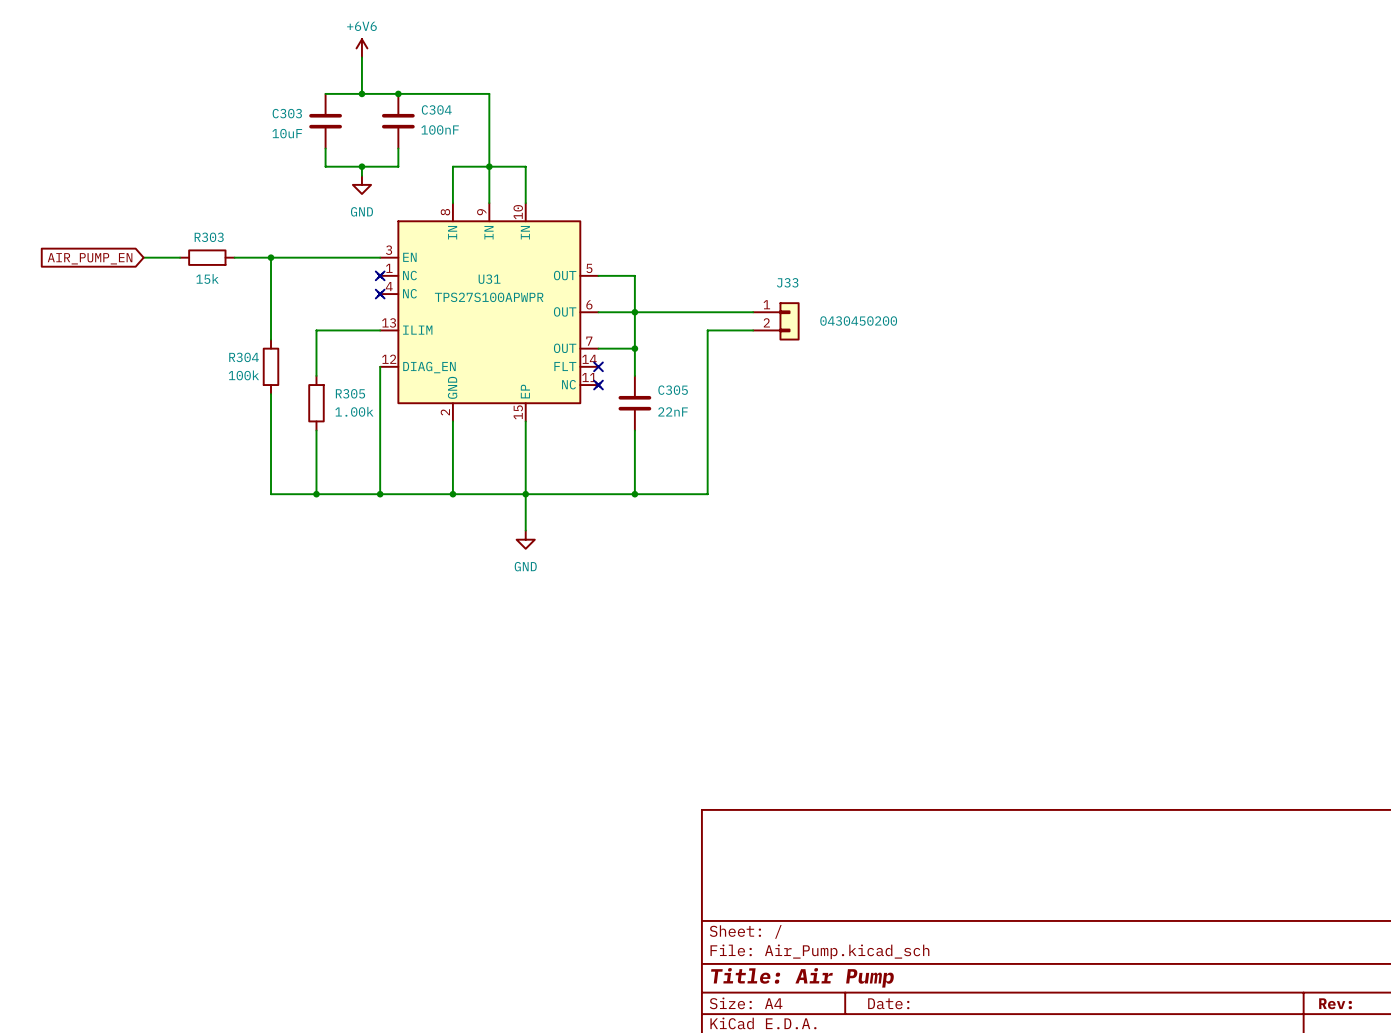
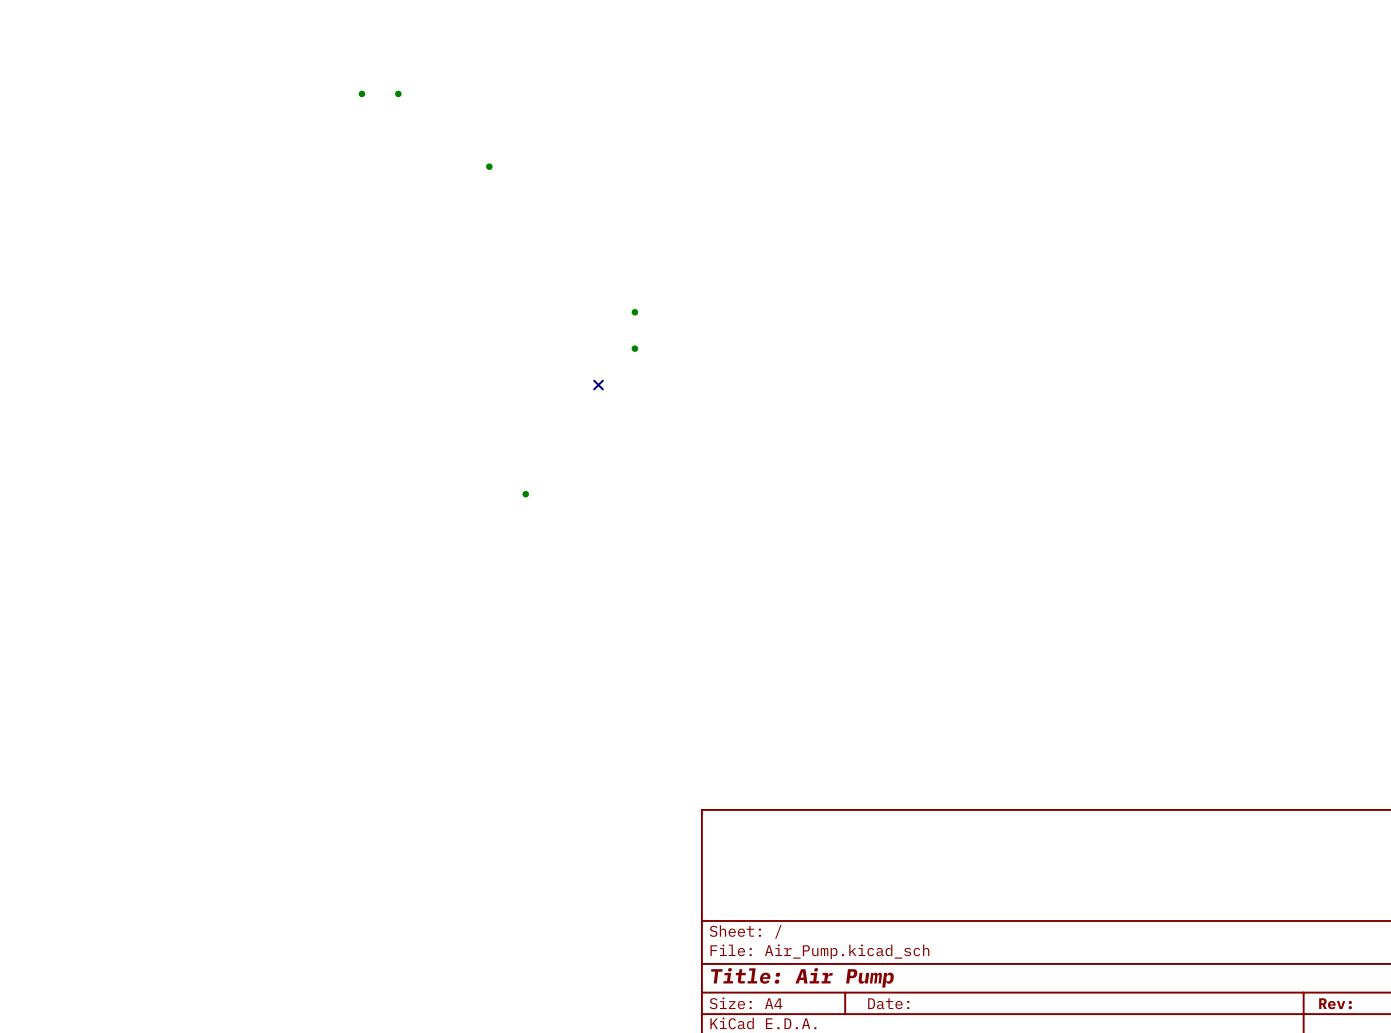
power symbol: +6V6 (361, 48) -> none
wire: (361, 57) (361, 93) -> none
wire: (325, 93) (489, 93) (489, 203) -> none
C303: 10uF (325, 121) -> none
C304: 100nF (398, 121) -> none
wire: (325, 148) (325, 166) (398, 166) (398, 148) -> none
wire: (361, 166) (361, 175) -> none
junction: (361, 166) -> none
power symbol: GND (361, 184) -> none
wire: (452, 203) (452, 166) (525, 166) (525, 203) -> none
wire: (143, 257) (180, 257) -> none
R303: 15k (207, 257) -> none
wire: (234, 257) (380, 257) -> none
wire: (271, 257) (271, 339) -> none
junction: (271, 257) -> none
global label: AIR_PUMP_EN (90, 258) -> none
no-connect mark: (380, 275) -> none
wire: (598, 275) (634, 275) (634, 375) -> none
no-connect mark: (380, 294) -> none
U31: TPS27S100APWPR (489, 312) -> none
wire: (598, 312) (753, 312) -> none
J33: 0430450200 (776, 321) -> none
wire: (380, 330) (316, 330) (316, 375) -> none
wire: (753, 330) (707, 330) (707, 494) (271, 494) (271, 394) -> none
wire: (598, 348) (634, 348) -> none
R304: 100k (271, 366) -> none
wire: (380, 366) (380, 494) -> none
no-connect mark: (598, 366) -> none
R305: 1.00k (316, 403) -> none
C305: 22nF (634, 403) -> none
wire: (452, 421) (452, 494) -> none
wire: (525, 421) (525, 530) -> none
wire: (316, 430) (316, 494) -> none
wire: (634, 430) (634, 494) -> none
junction: (316, 494) -> none
junction: (380, 494) -> none
junction: (452, 494) -> none
junction: (634, 494) -> none
power symbol: GND (525, 539) -> none

